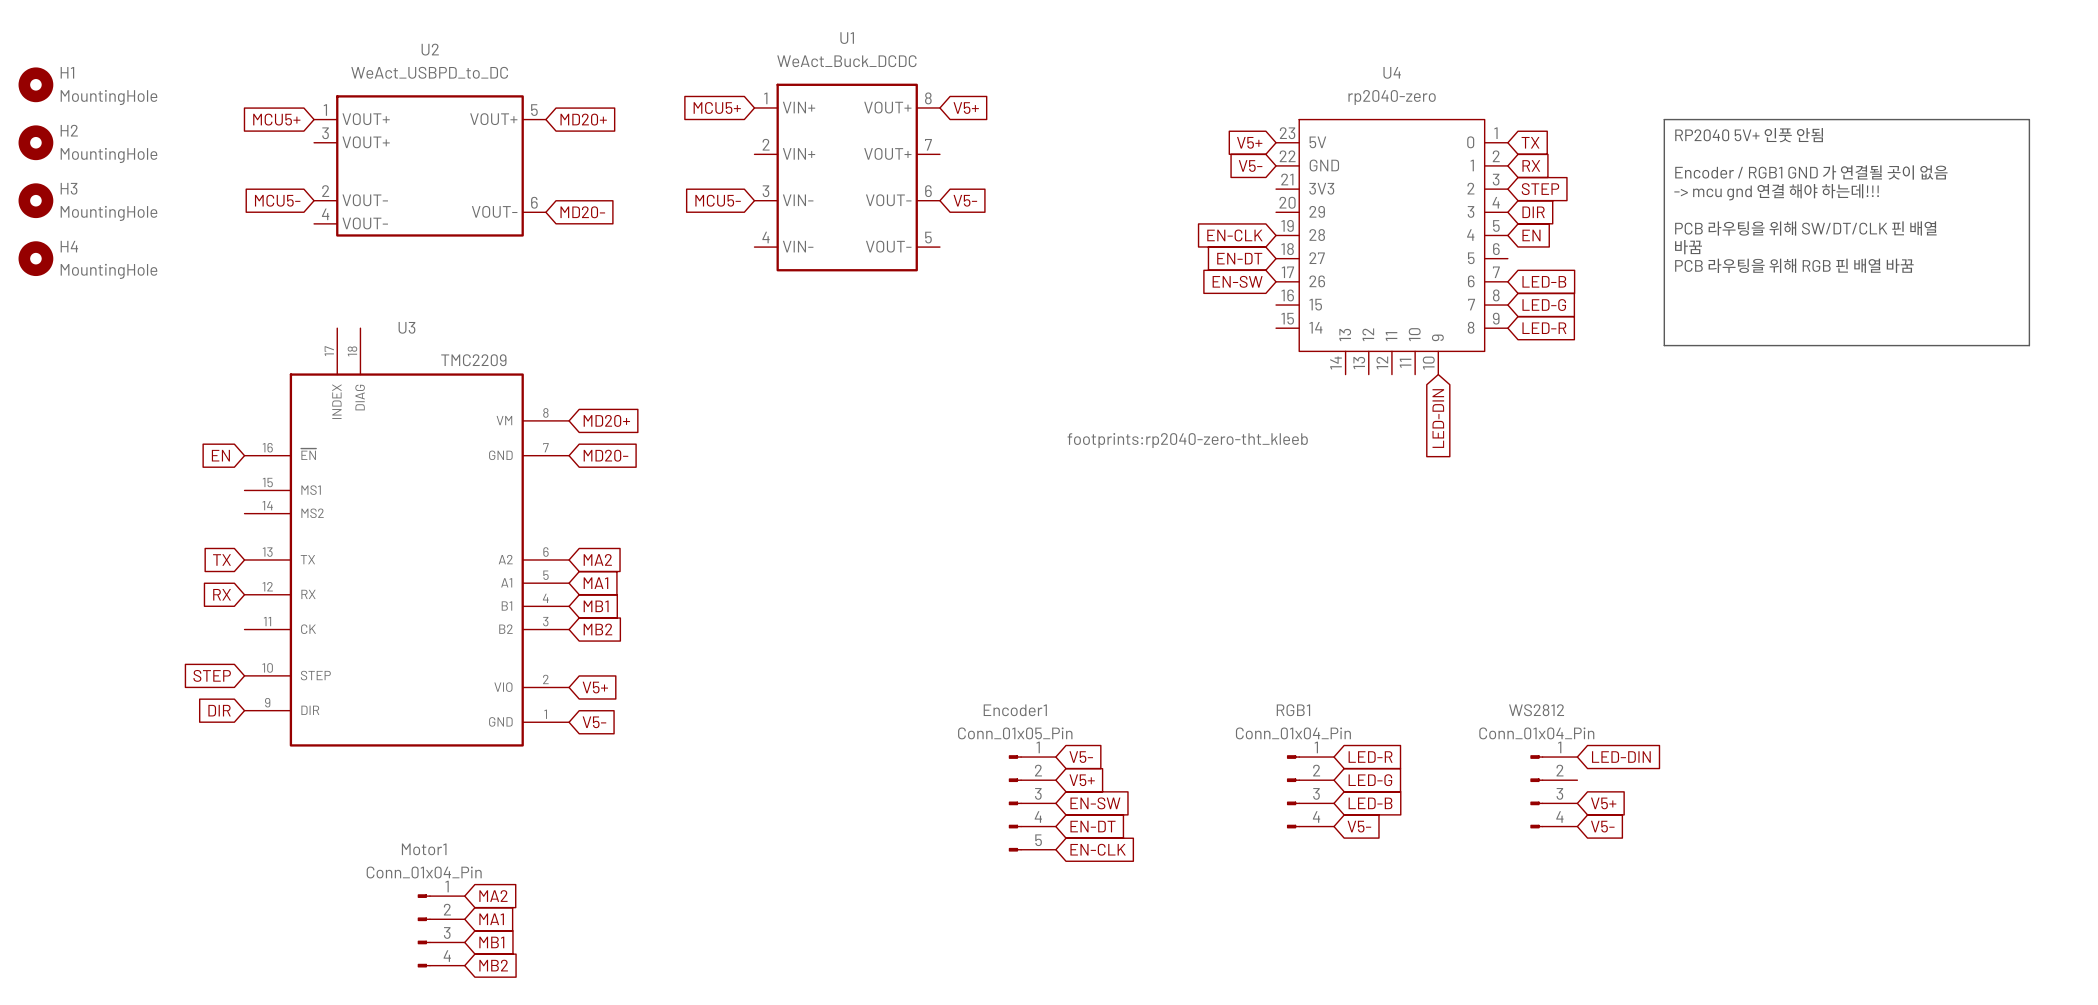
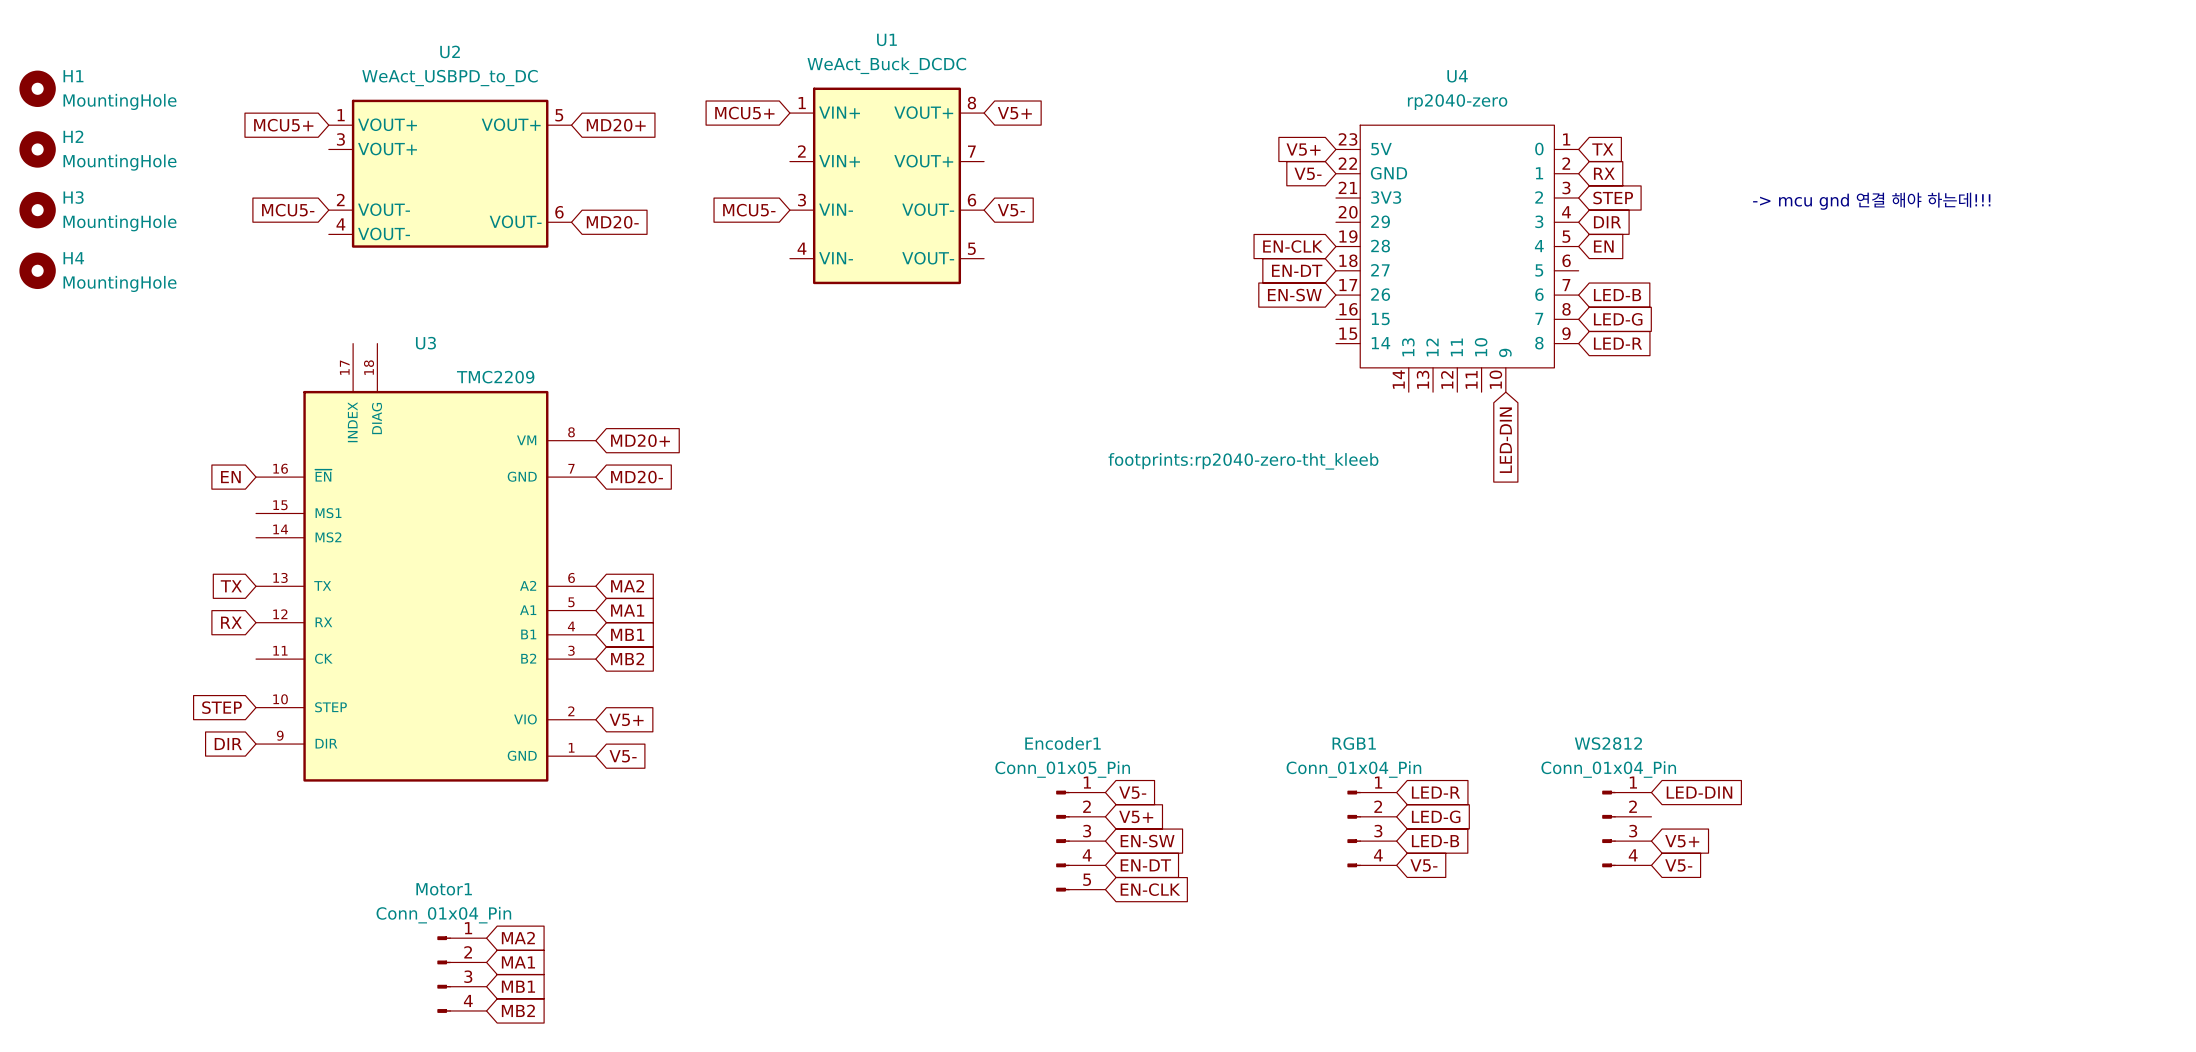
line: (1664, 119) (2029, 119) (2029, 345) (1664, 345) (1664, 119) -> none
text: RP2040 5V+ 인풋 안됨 (1749, 135) -> none
text: Encoder / RGB1 GND 가 연결될 곳이 없음 (1811, 172) -> none
text: PCB 라우팅을 위해 SW/DT/CLK 핀 배열 (1805, 228) -> none
text: 바꿈 (1688, 247) -> none
text: PCB 라우팅을 위해 RGB 핀 배열 바꿈 (1794, 265) -> none

